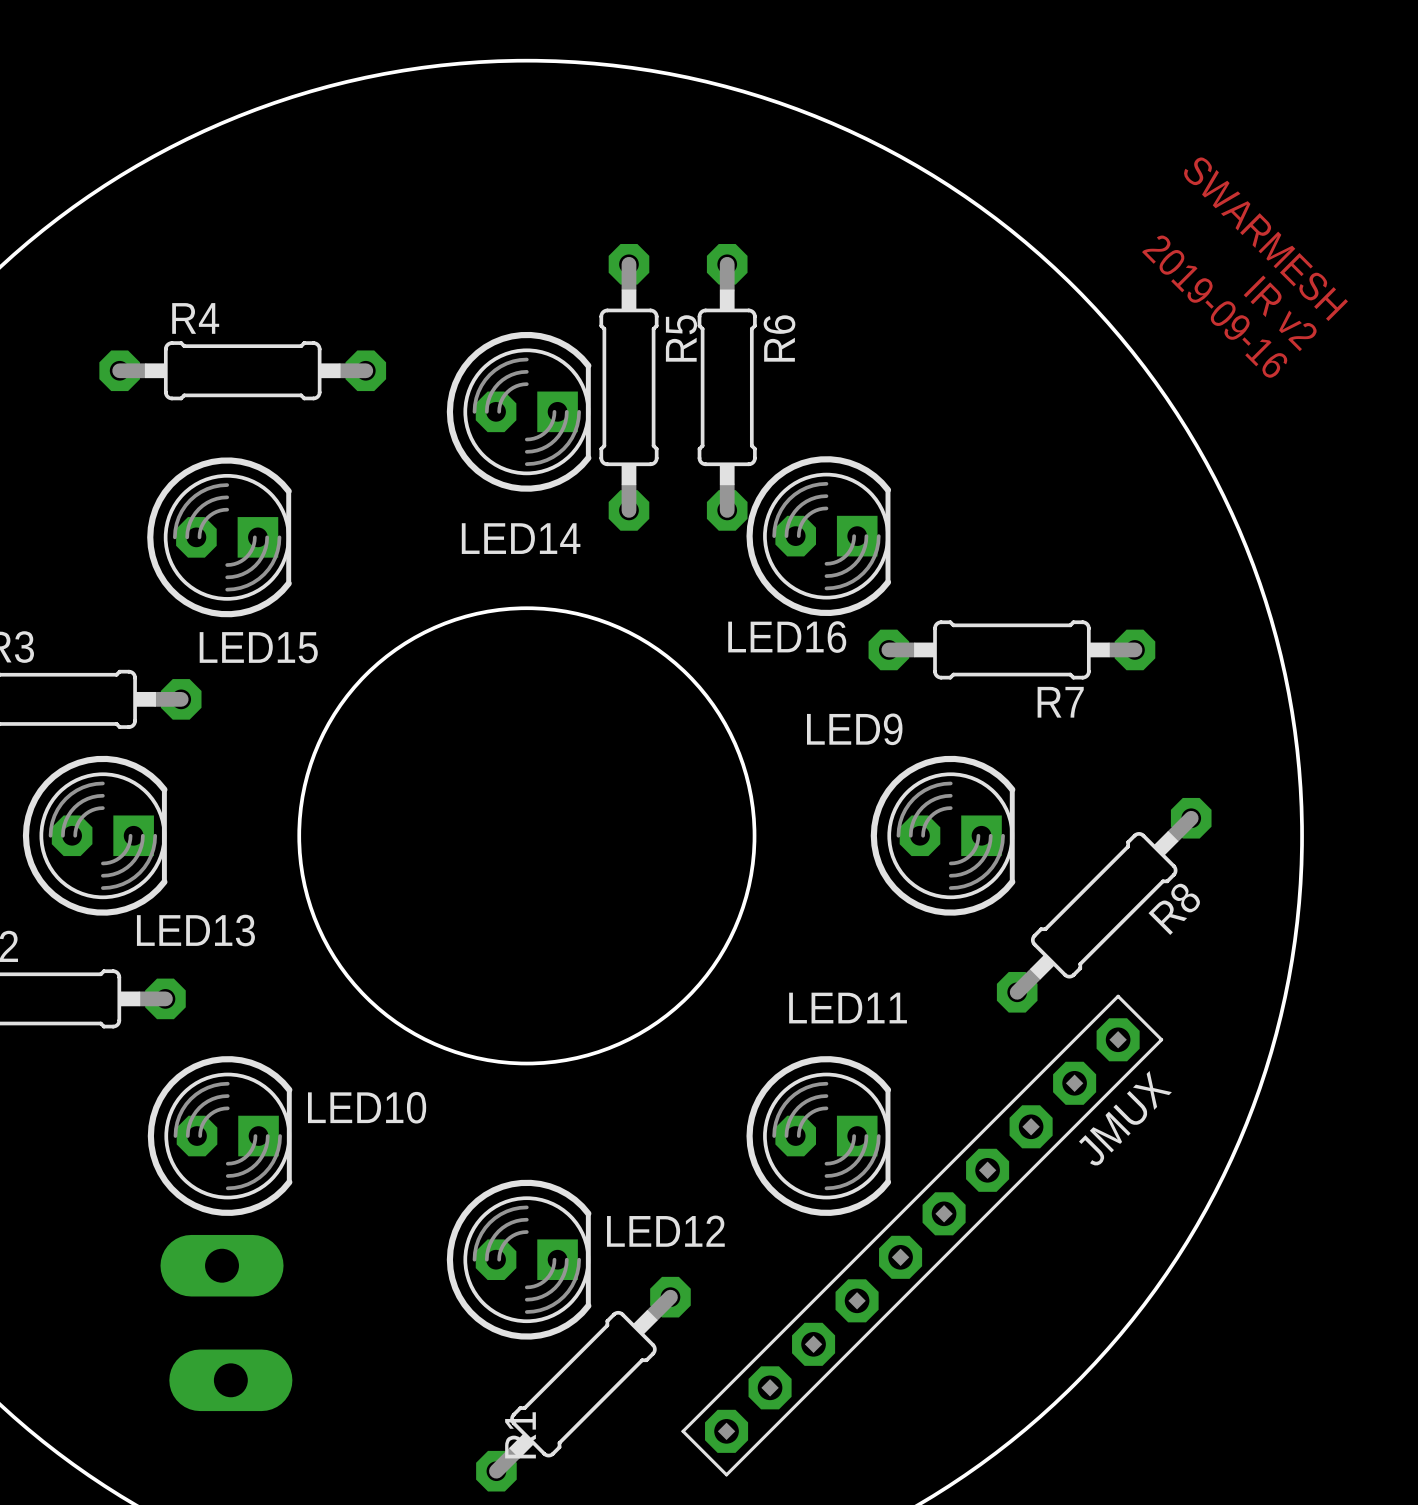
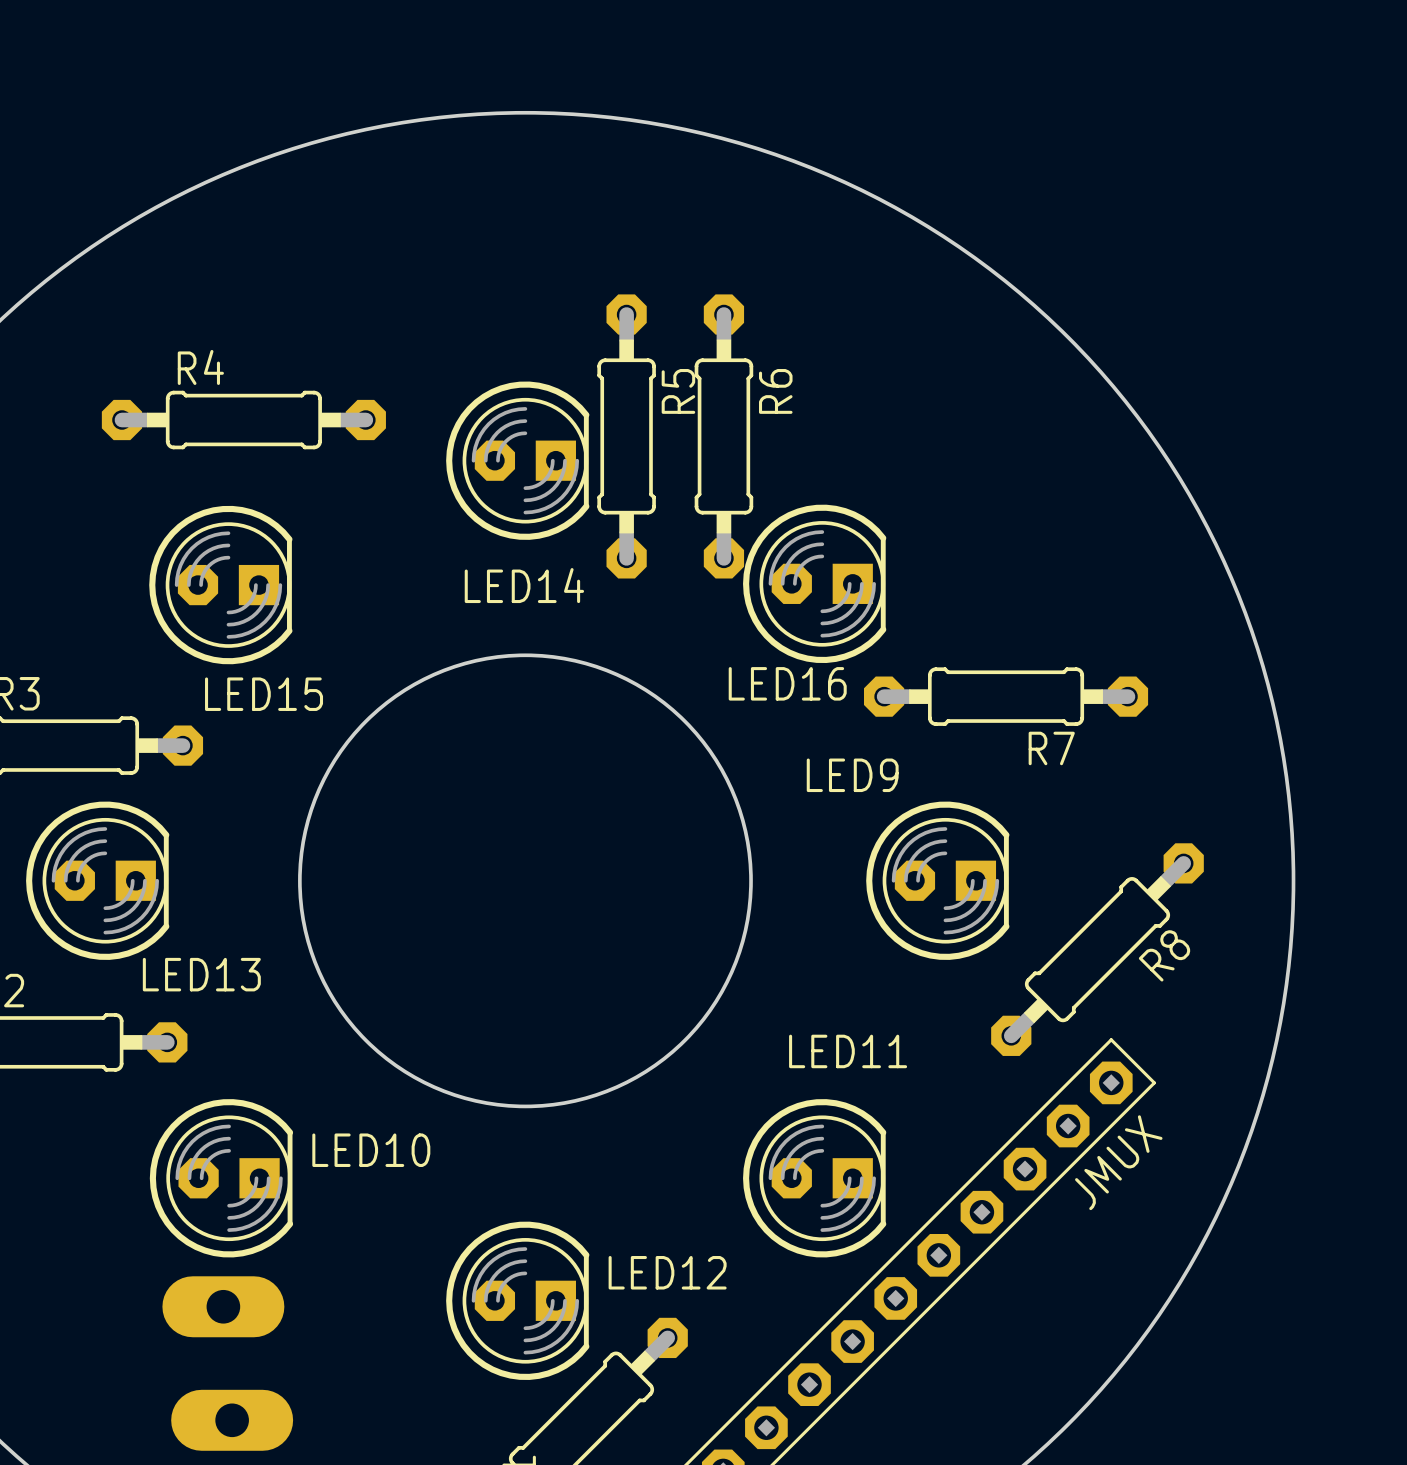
text: SWARMESH (1264, 239) -> none
text: 2019-09-16 (1215, 306) -> none
text: IR v2 (1280, 313) -> none

